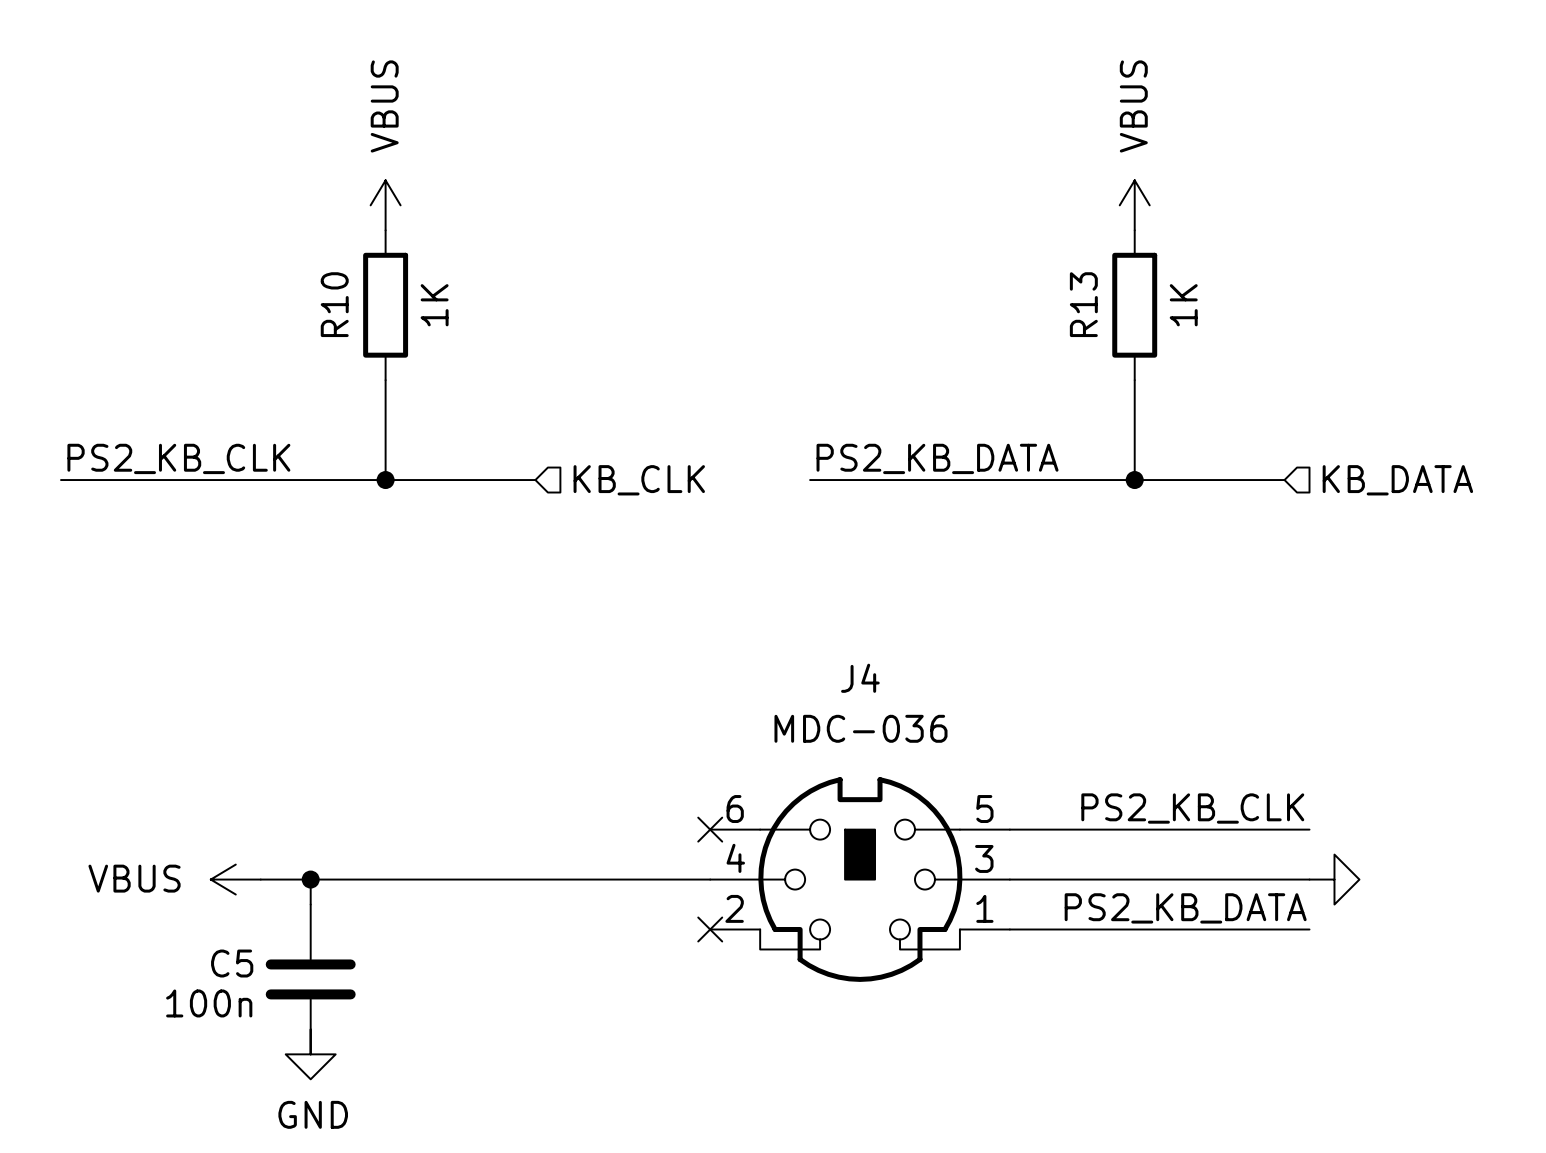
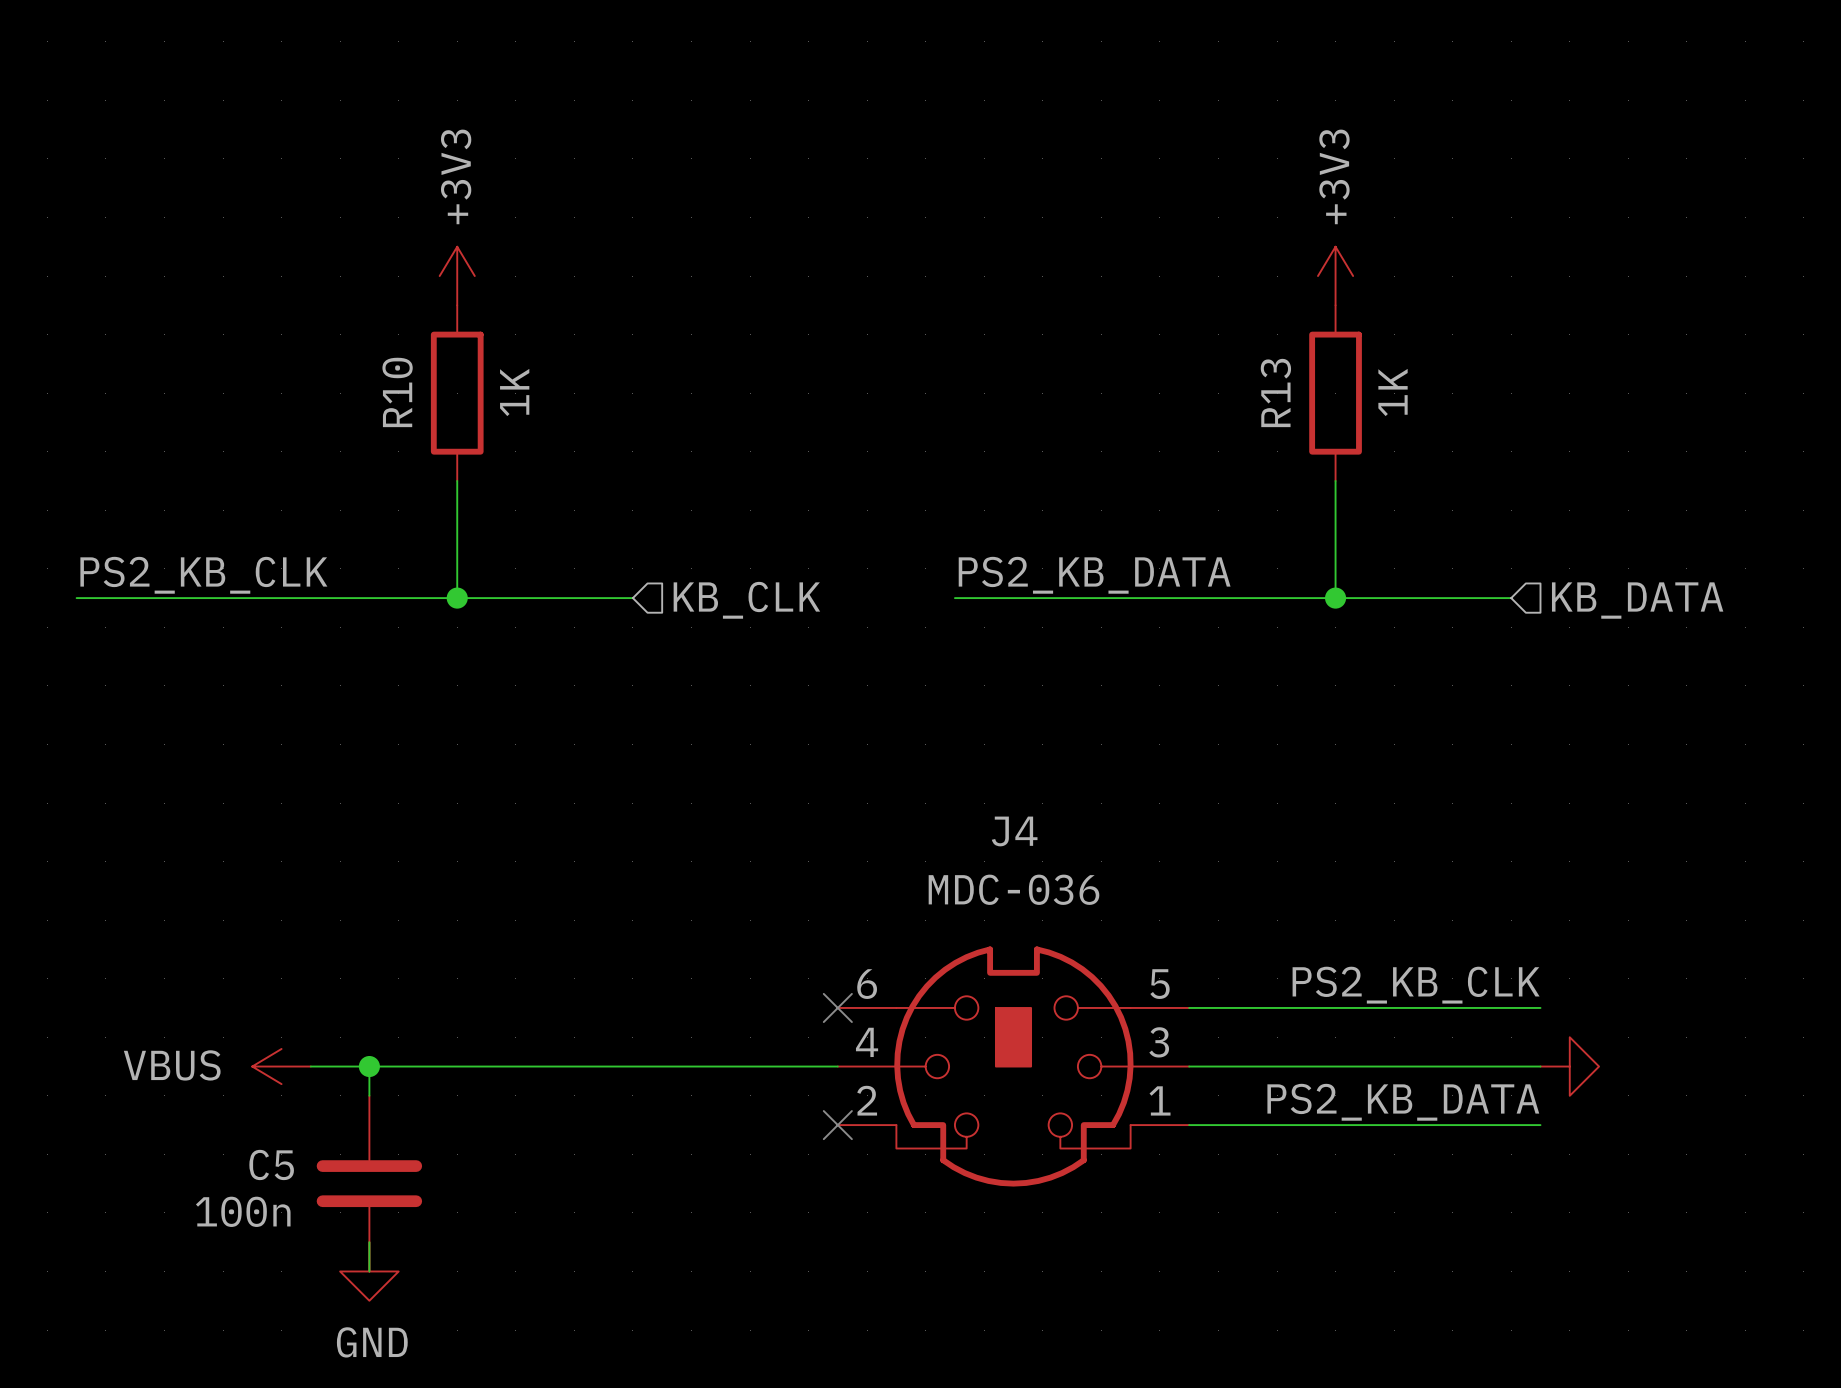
power symbol: VBUS (385, 205) -> +3V3 (457, 276)
power symbol: VBUS (1134, 205) -> +3V3 (1335, 276)

